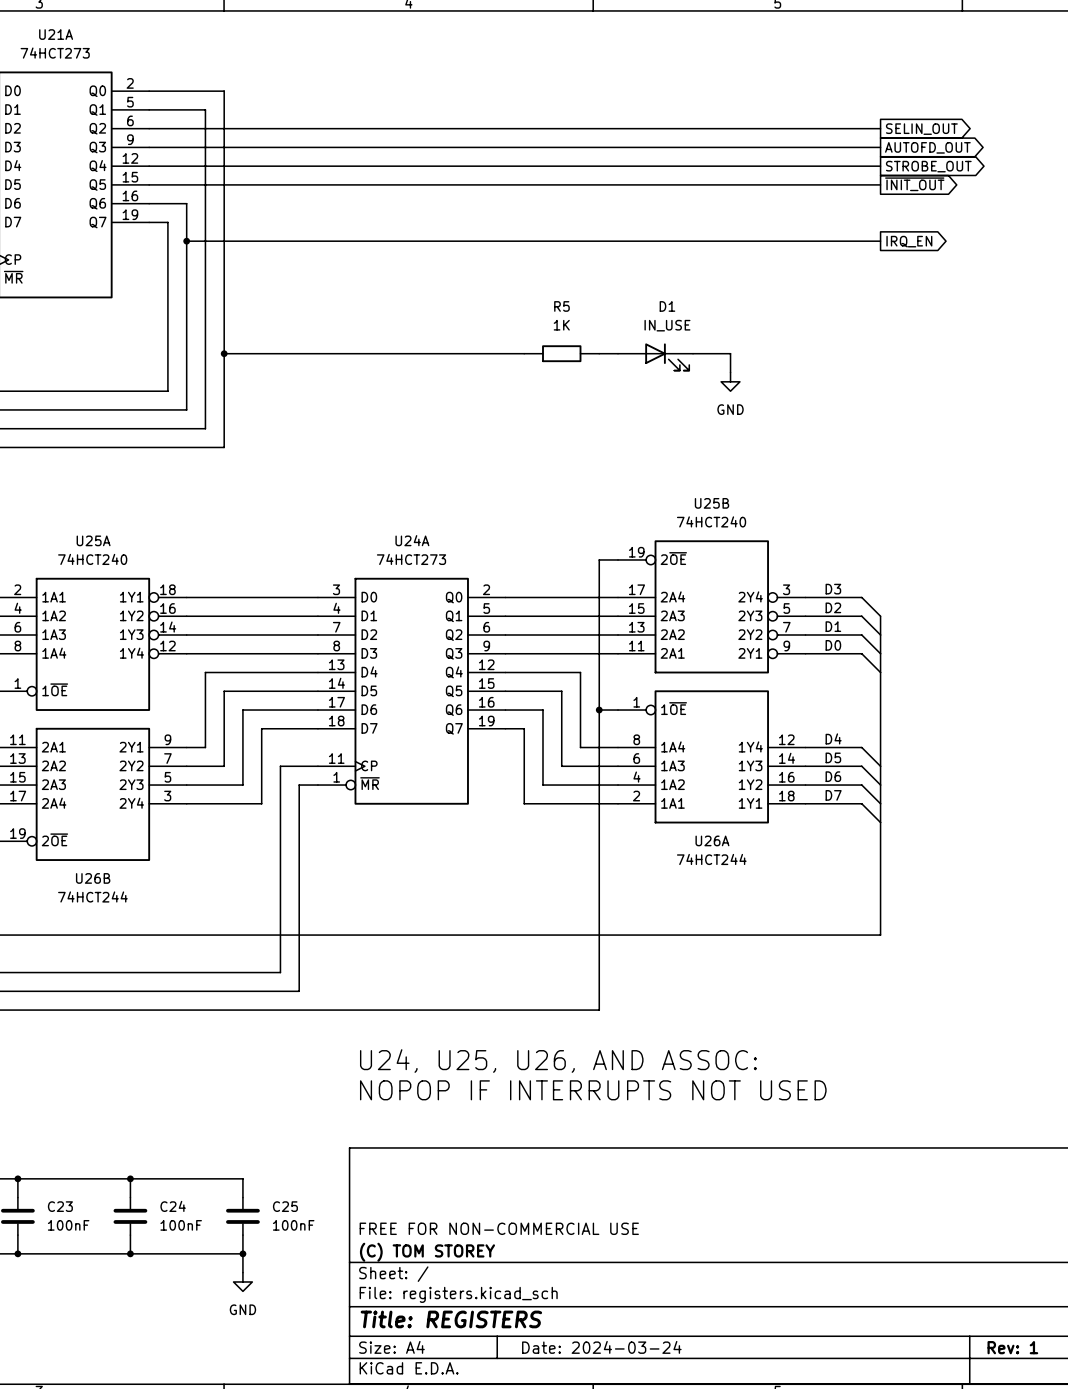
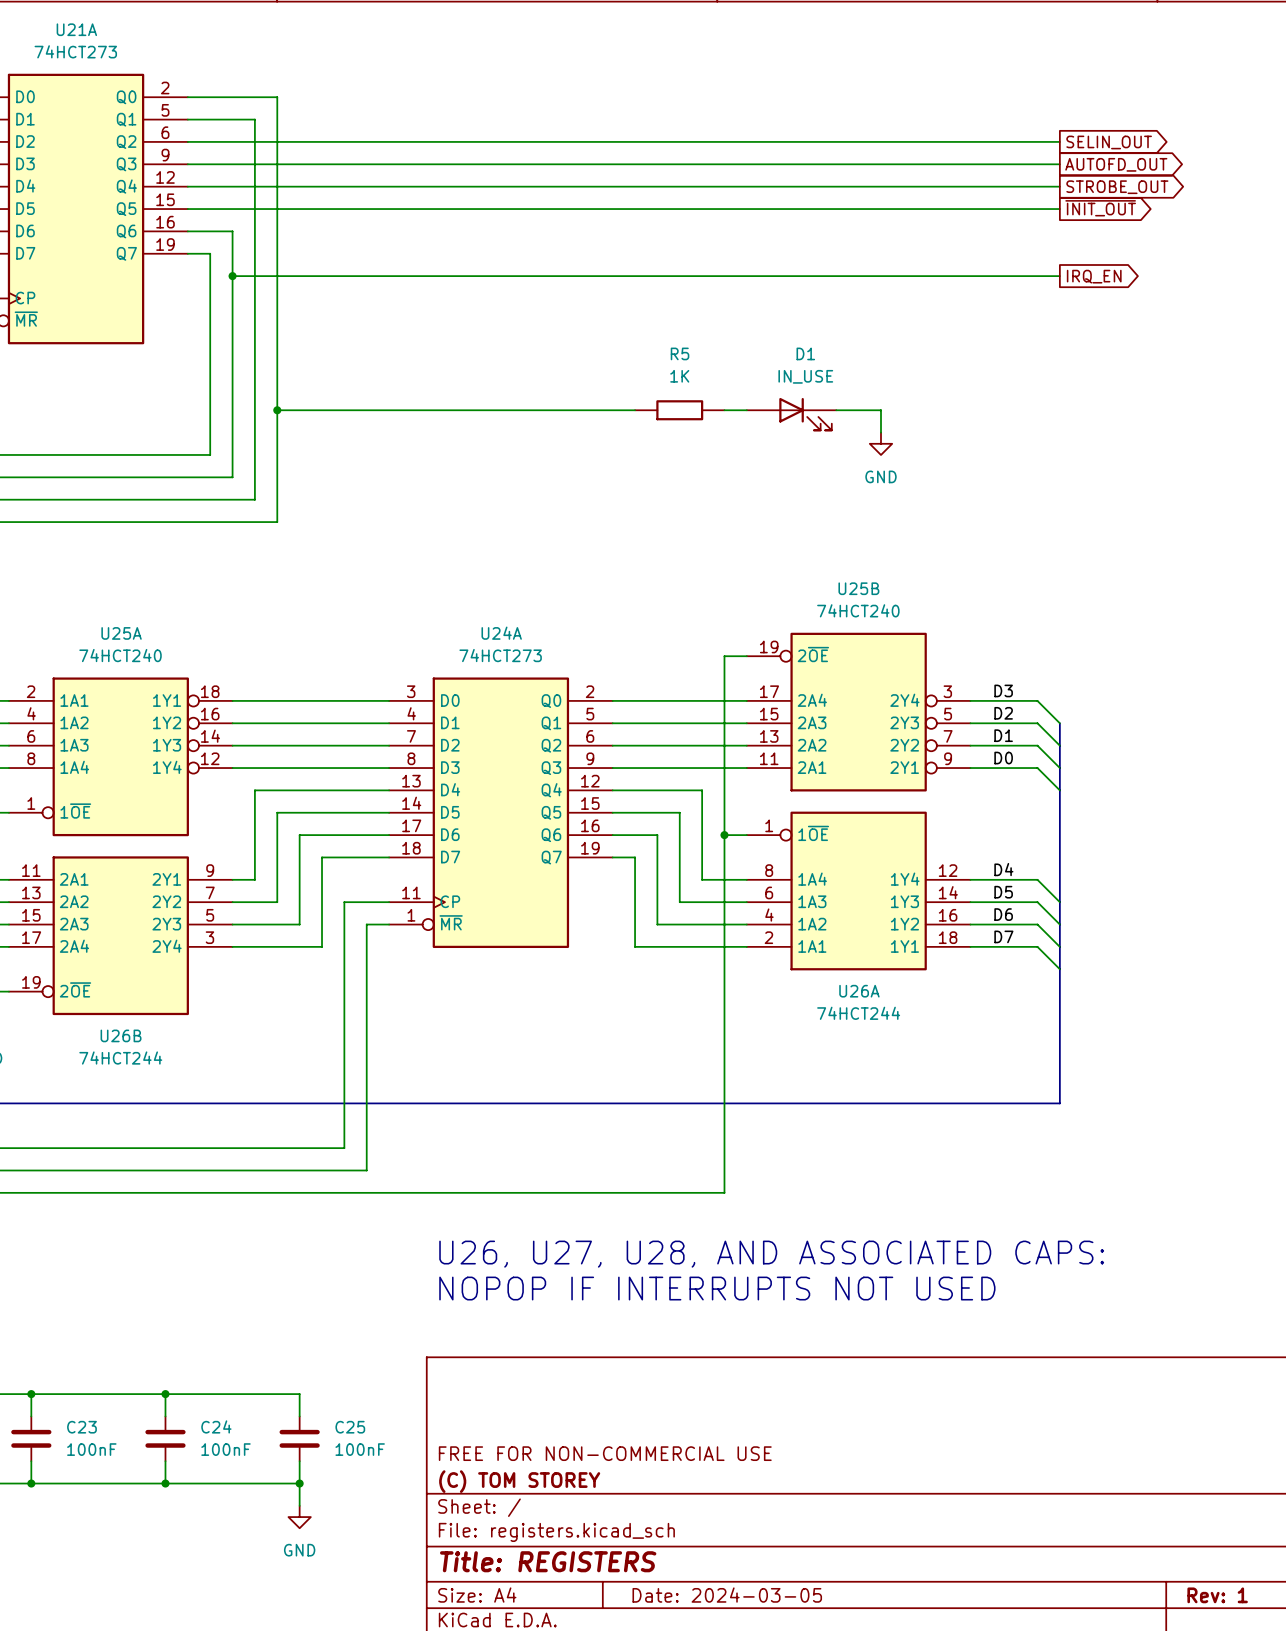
text: U24, U25, U26, AND ASSOC: (558, 1061) -> U26, U27, U28, AND ASSOCIATED CAPS: (771, 1254)
title block: Date: 2024-03-24 (601, 1347) -> Date: 2024-03-05 (727, 1595)

